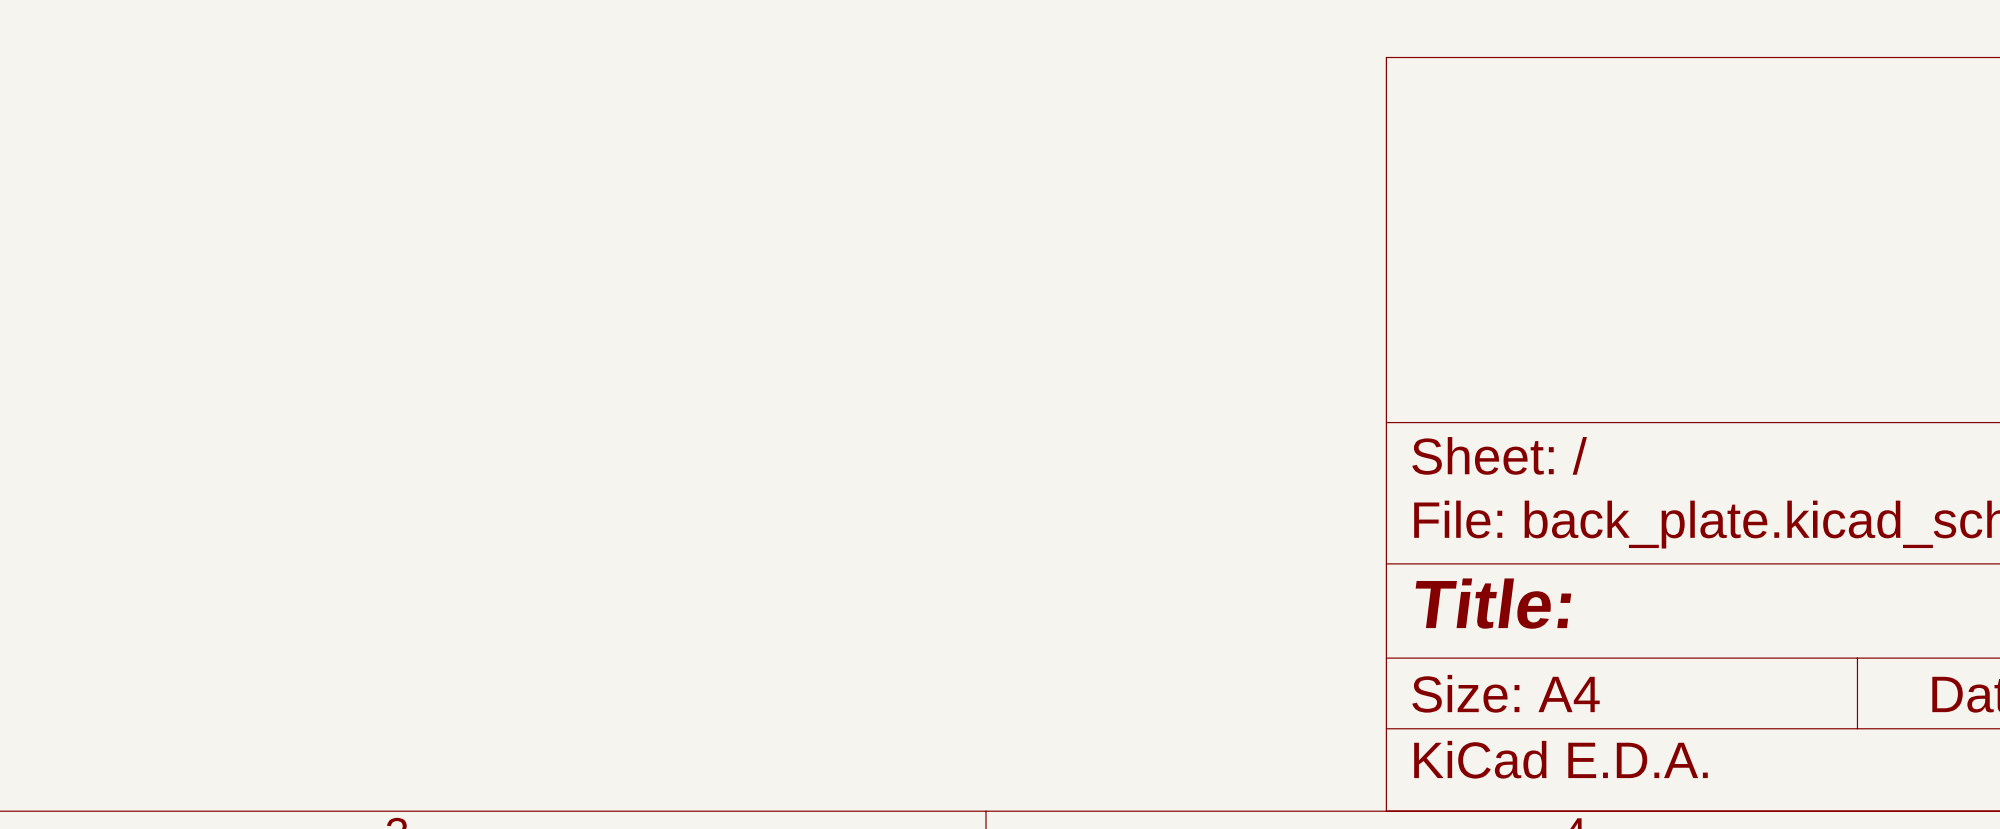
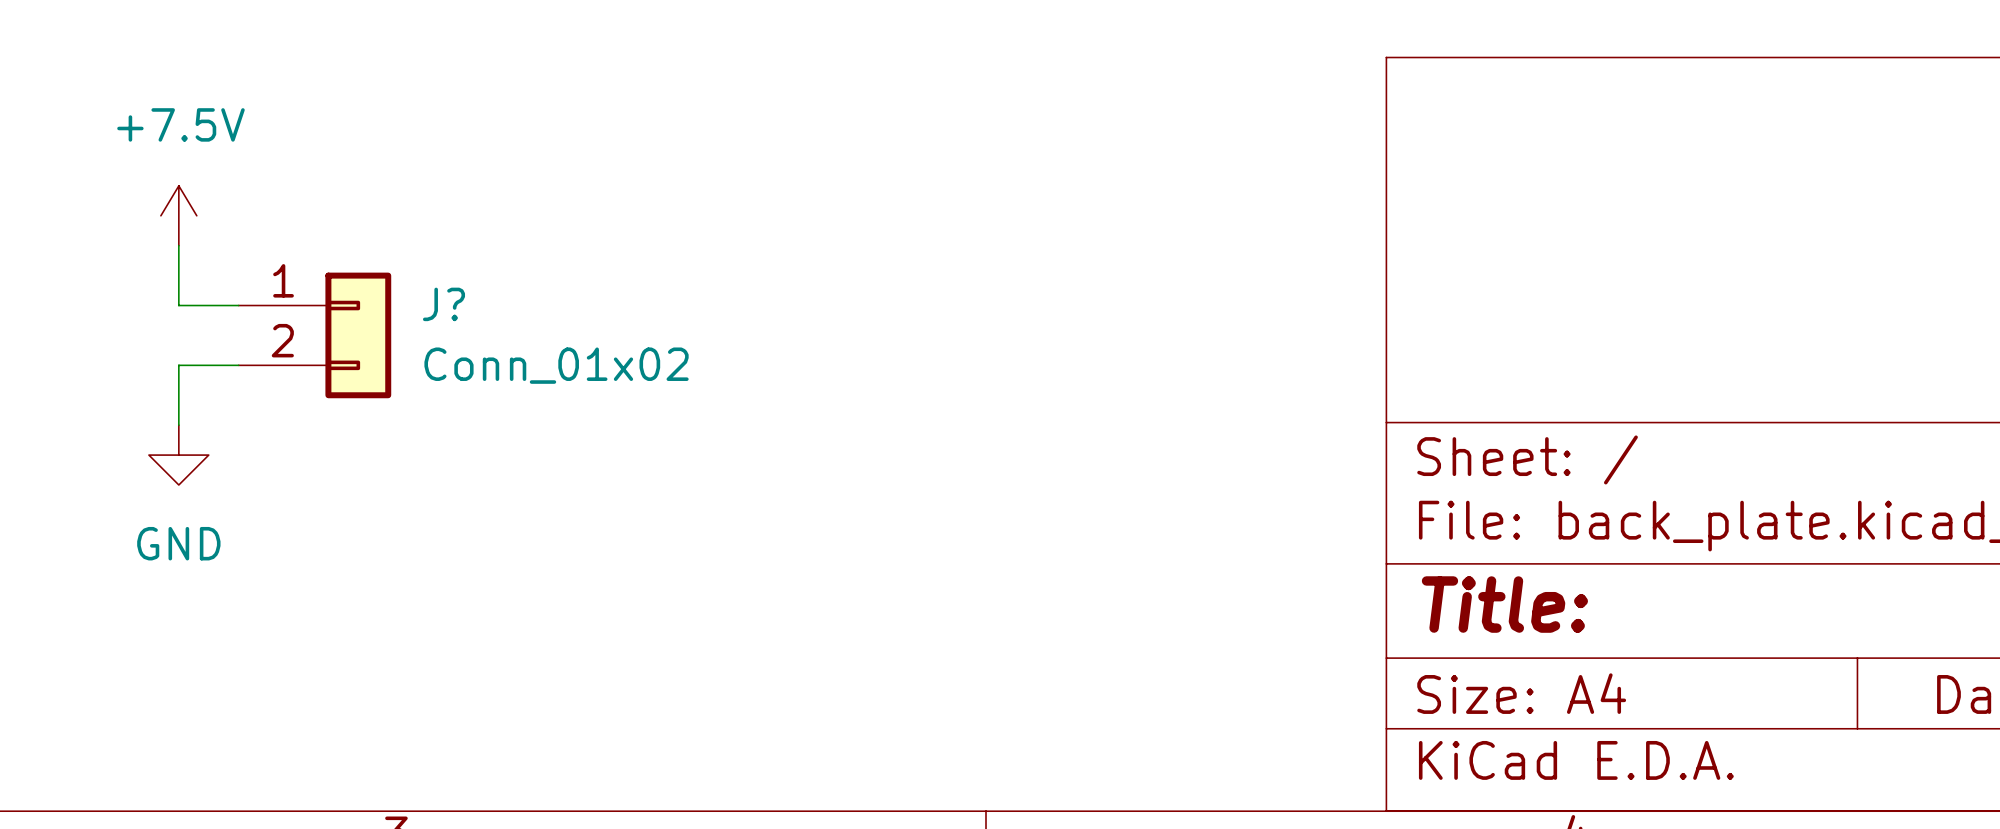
power symbol: none -> +7.5V (178, 215)
wire: none -> (178, 245) (178, 305) (238, 305)
J?: none -> Conn_01x02 (314, 335)
wire: none -> (238, 365) (178, 365) (178, 425)
power symbol: none -> GND (178, 455)

